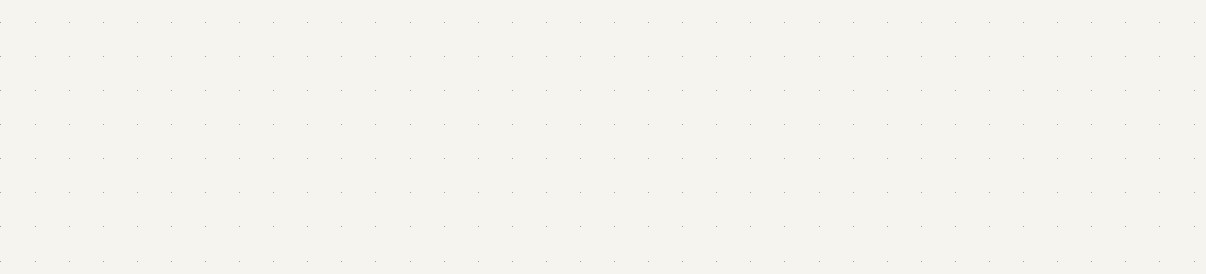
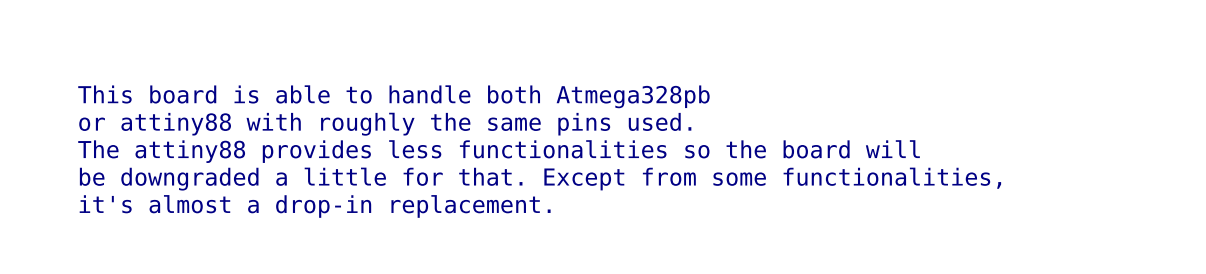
text: none -> This board is able to handle both Atmega328pb (393, 96)
text: none -> or attiny88 with roughly the same pins used. (385, 124)
text: none -> The attiny88 provides less functionalities so the board will (499, 151)
text: none -> be downgraded a little for that. Except from some functionalities, (540, 179)
text: none -> it's almost a drop-in replacement. (315, 206)

